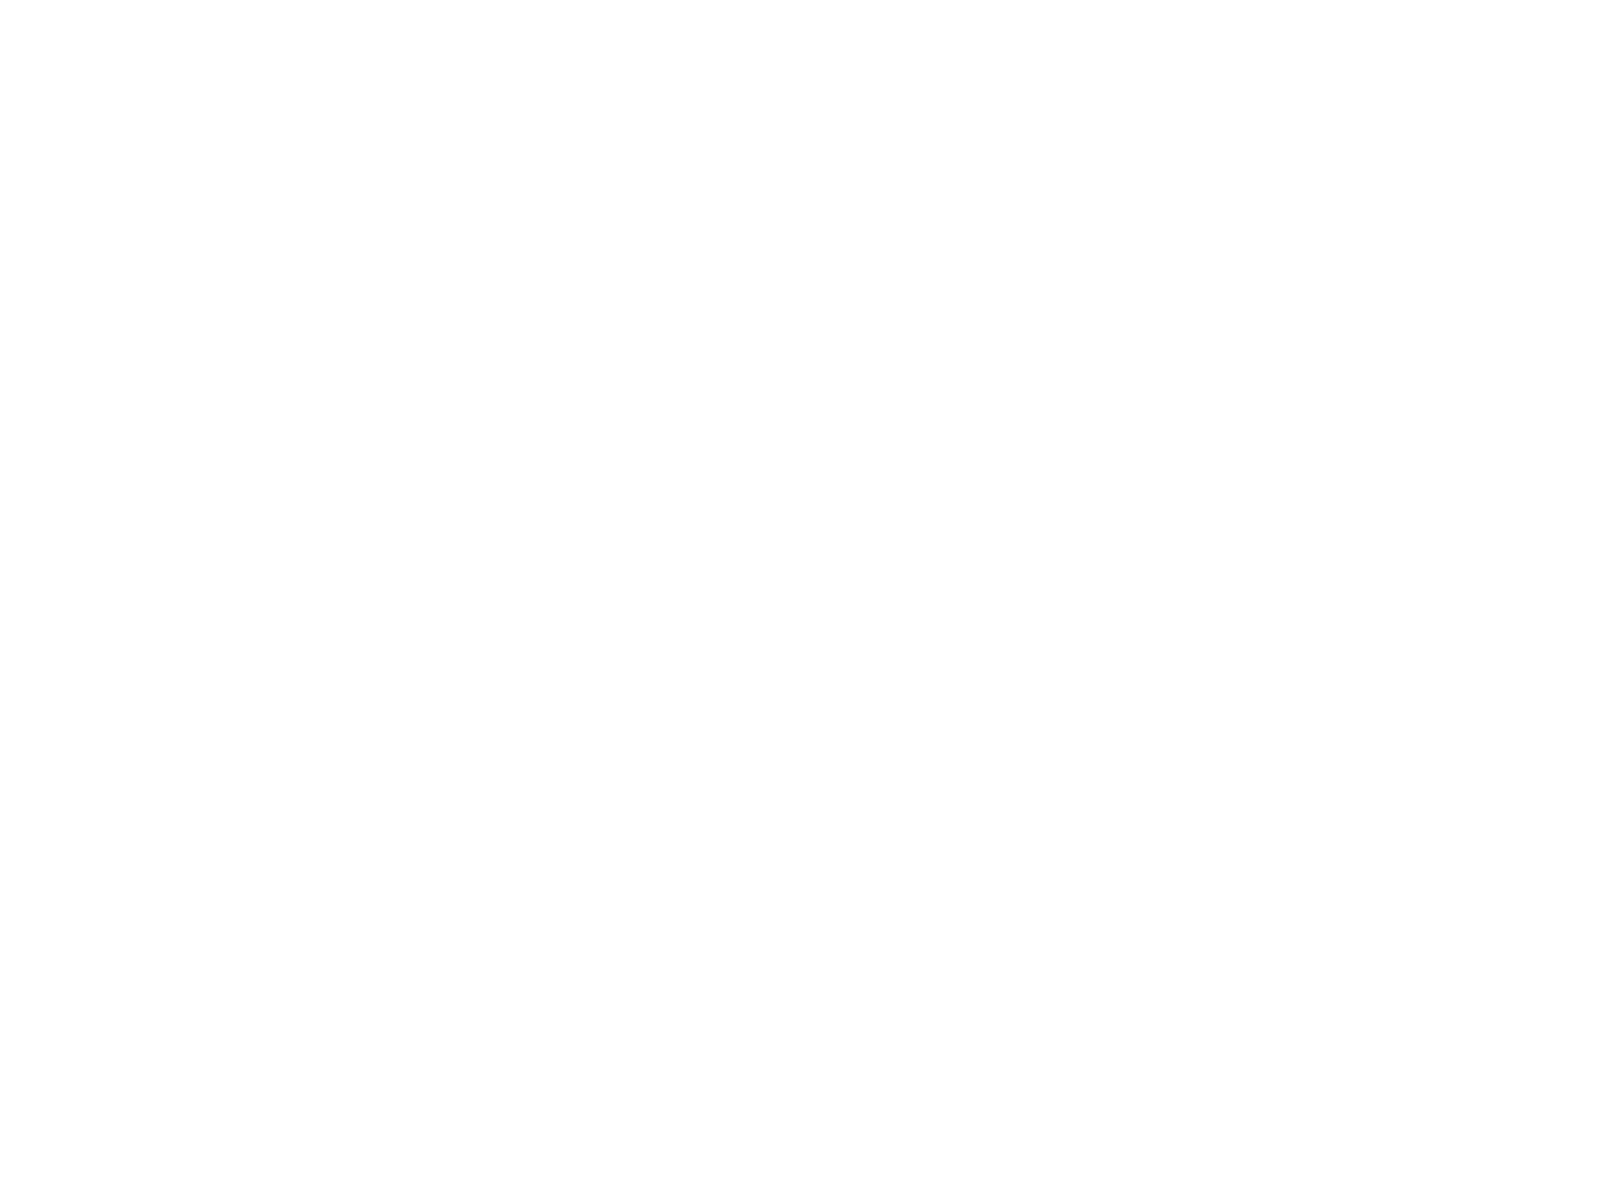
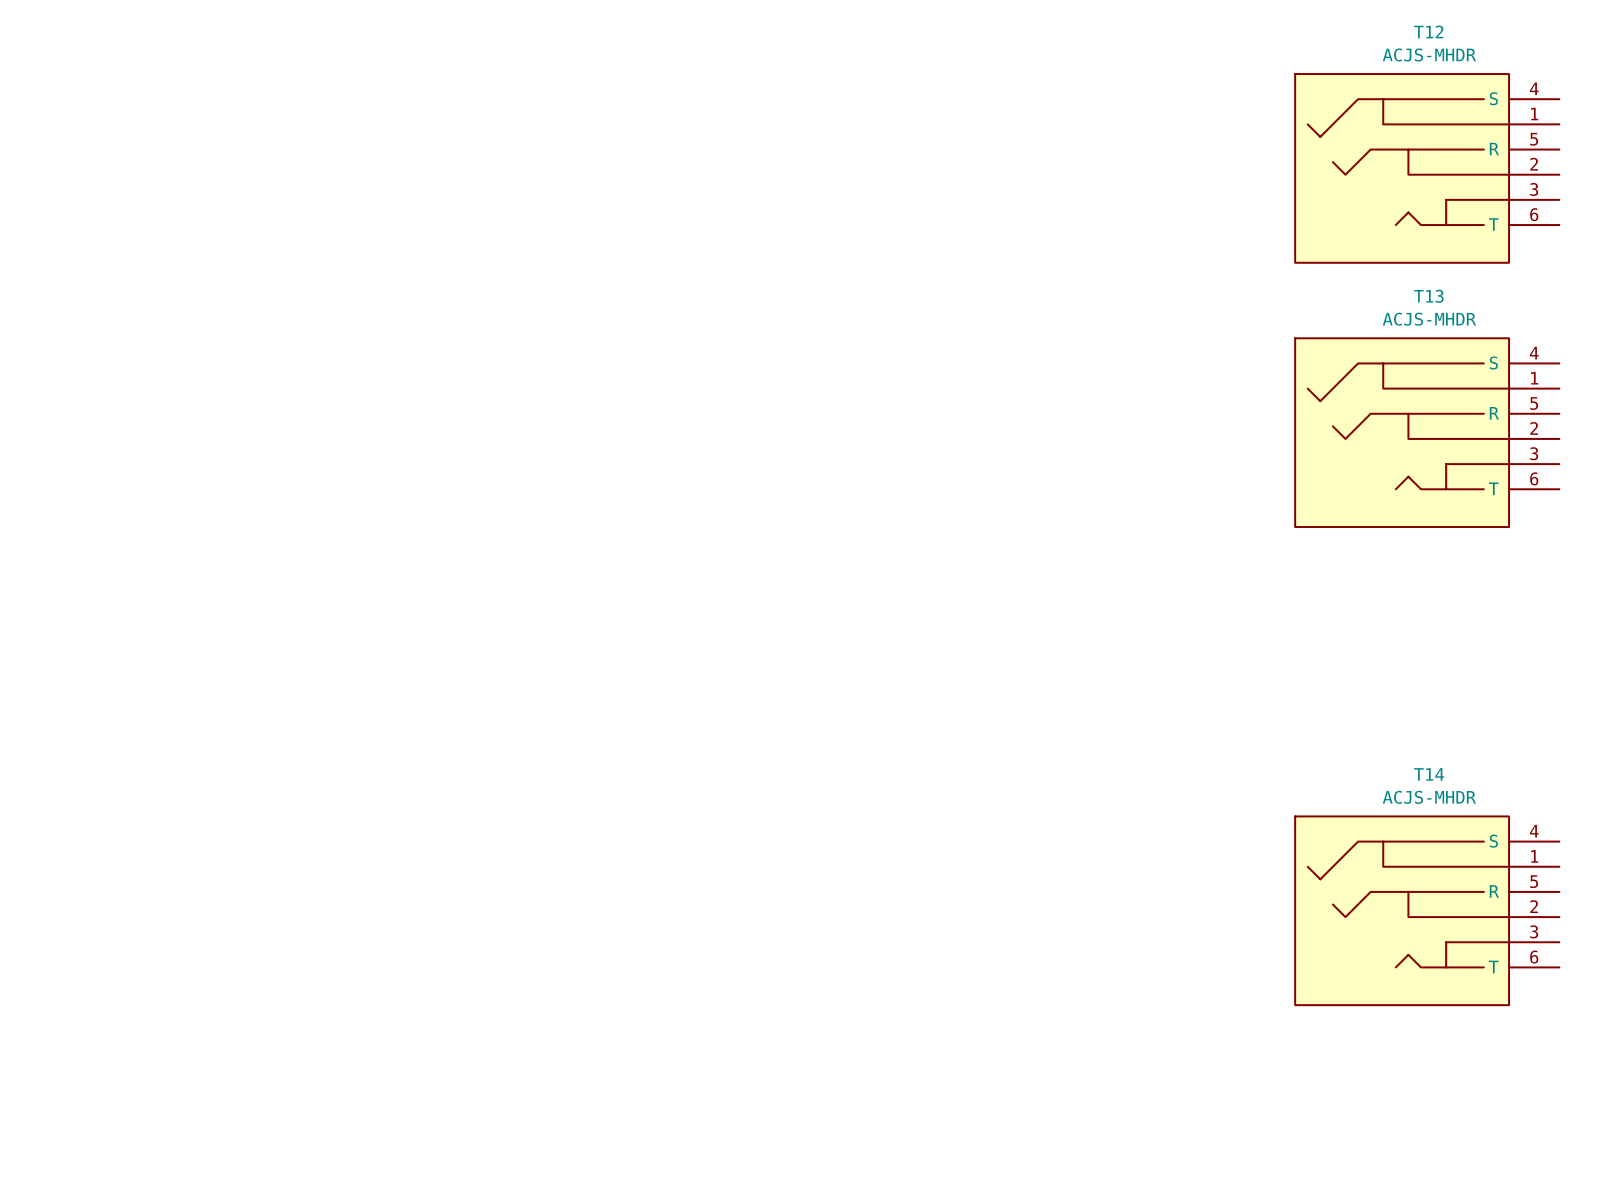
T12: none -> ACJS-MHDR (1427, 168)
T13: none -> ACJS-MHDR (1427, 432)
T14: none -> ACJS-MHDR (1427, 910)

